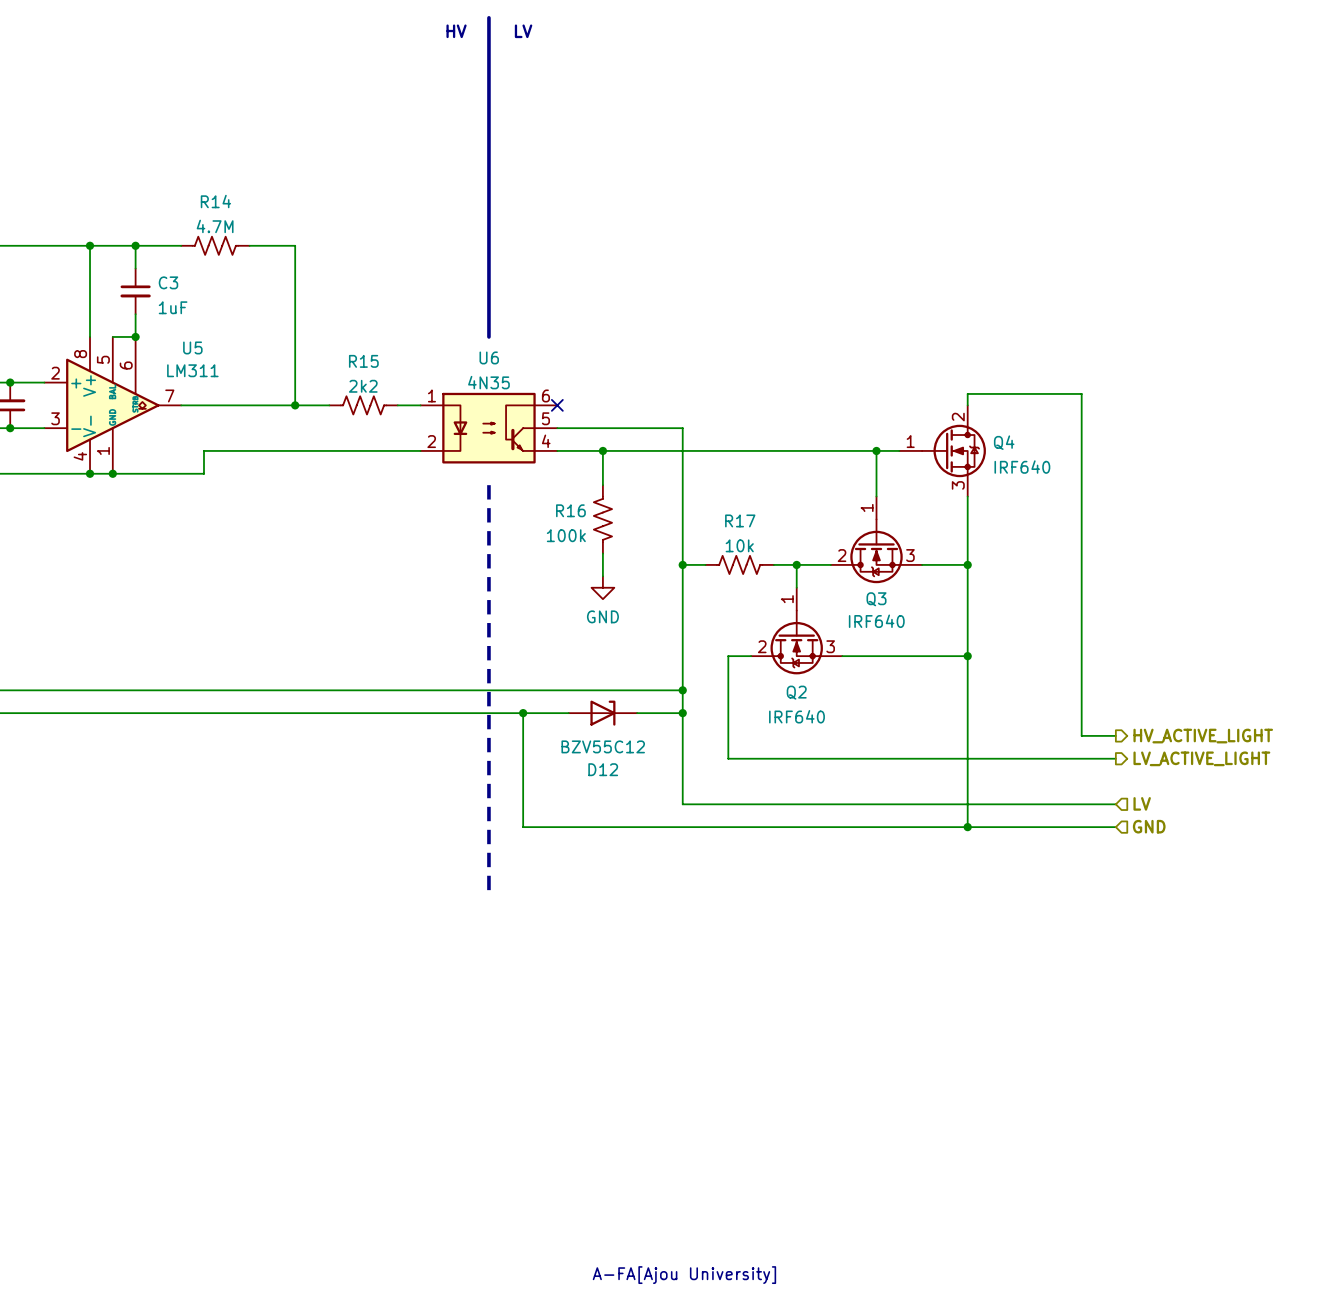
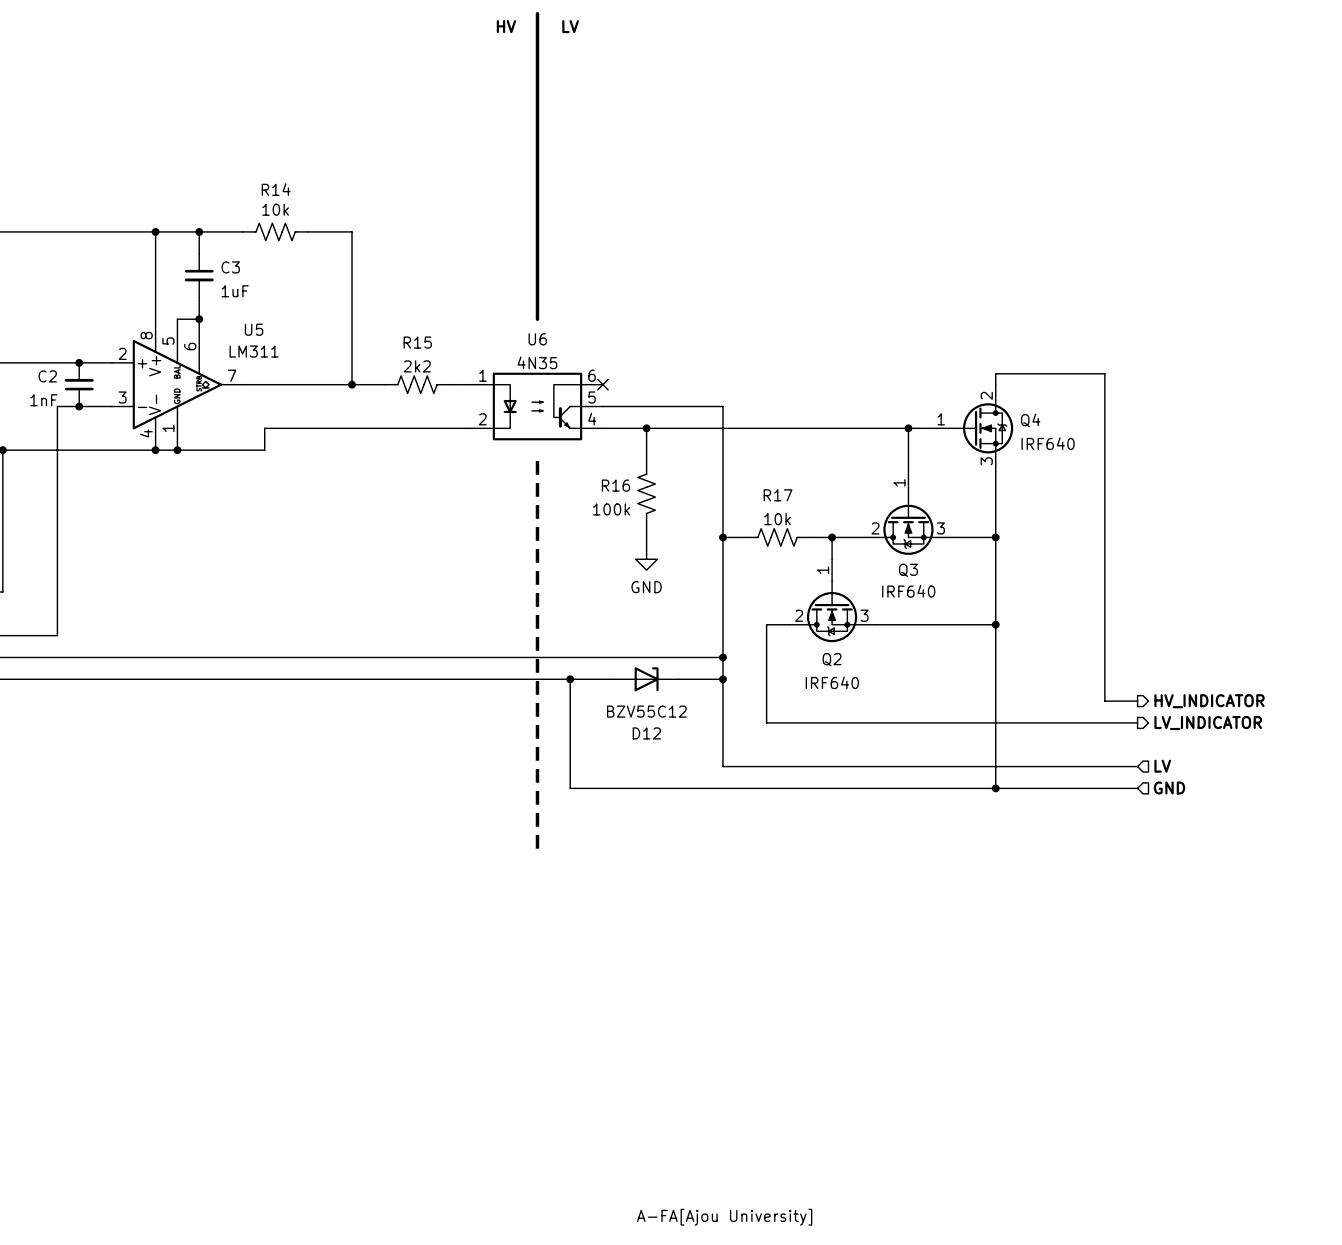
R14 value: 4.7M (215, 226) -> 10k (275, 209)
hierarchical label: HV_ACTIVE_LIGHT (1203, 736) -> HV_INDICATOR (1209, 701)
hierarchical label: LV_ACTIVE_LIGHT (1201, 758) -> LV_INDICATOR (1208, 723)

